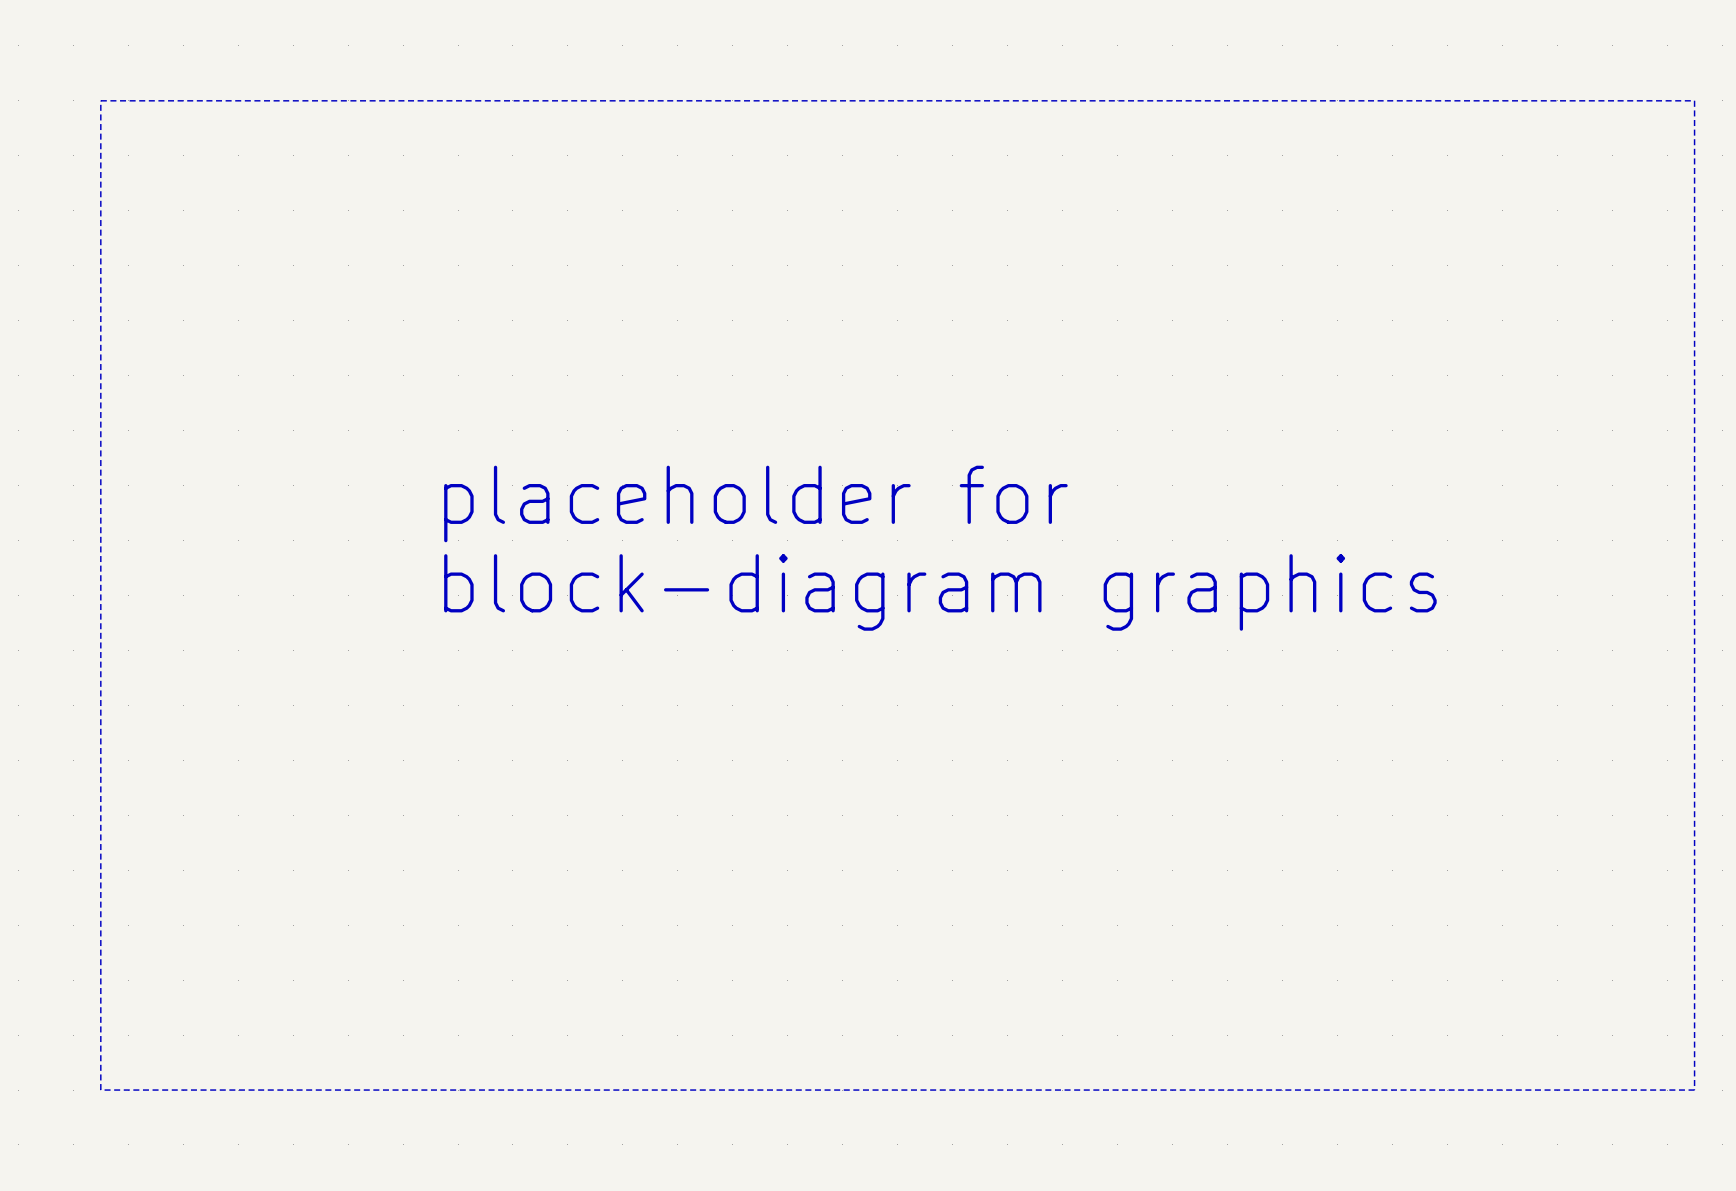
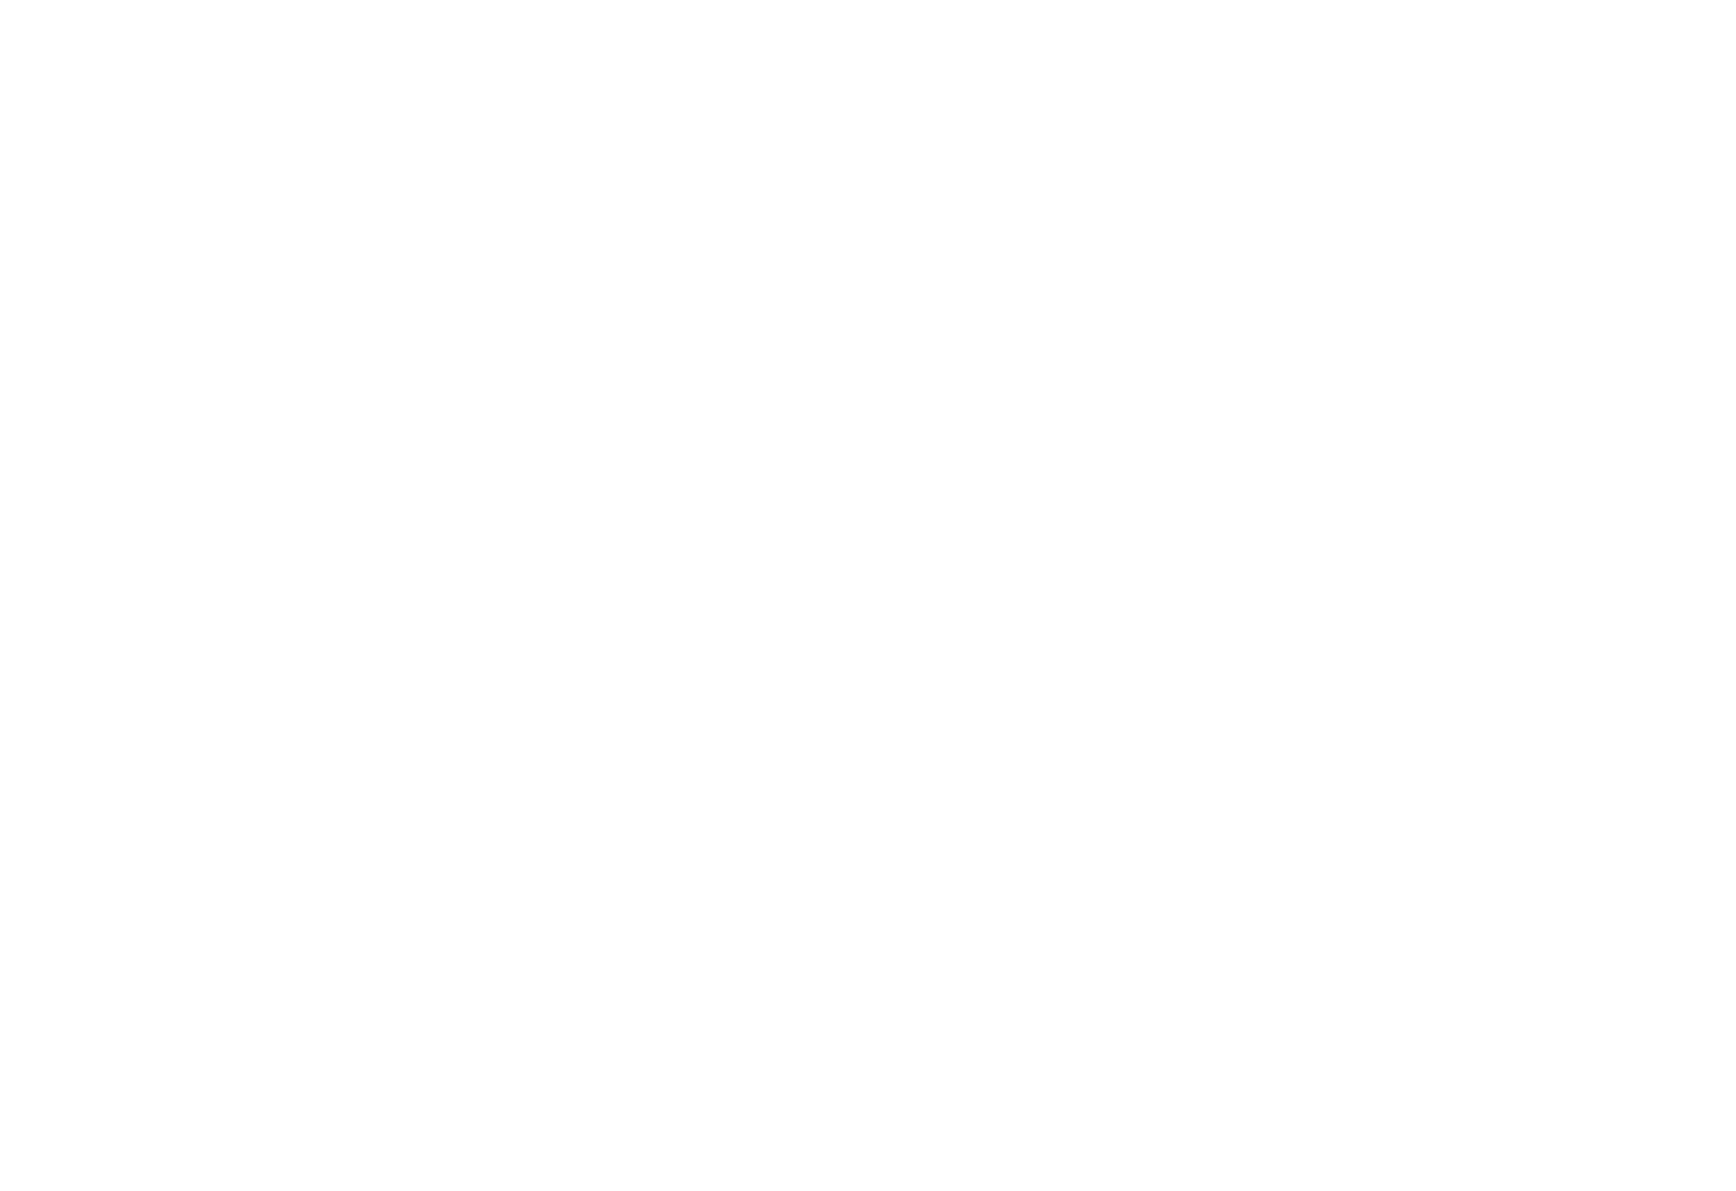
line: (100, 100) (1694, 100) (1694, 1090) (100, 1090) (100, 100) -> none
text: placeholder for (755, 503) -> none
text: block-diagram graphics (940, 592) -> none

